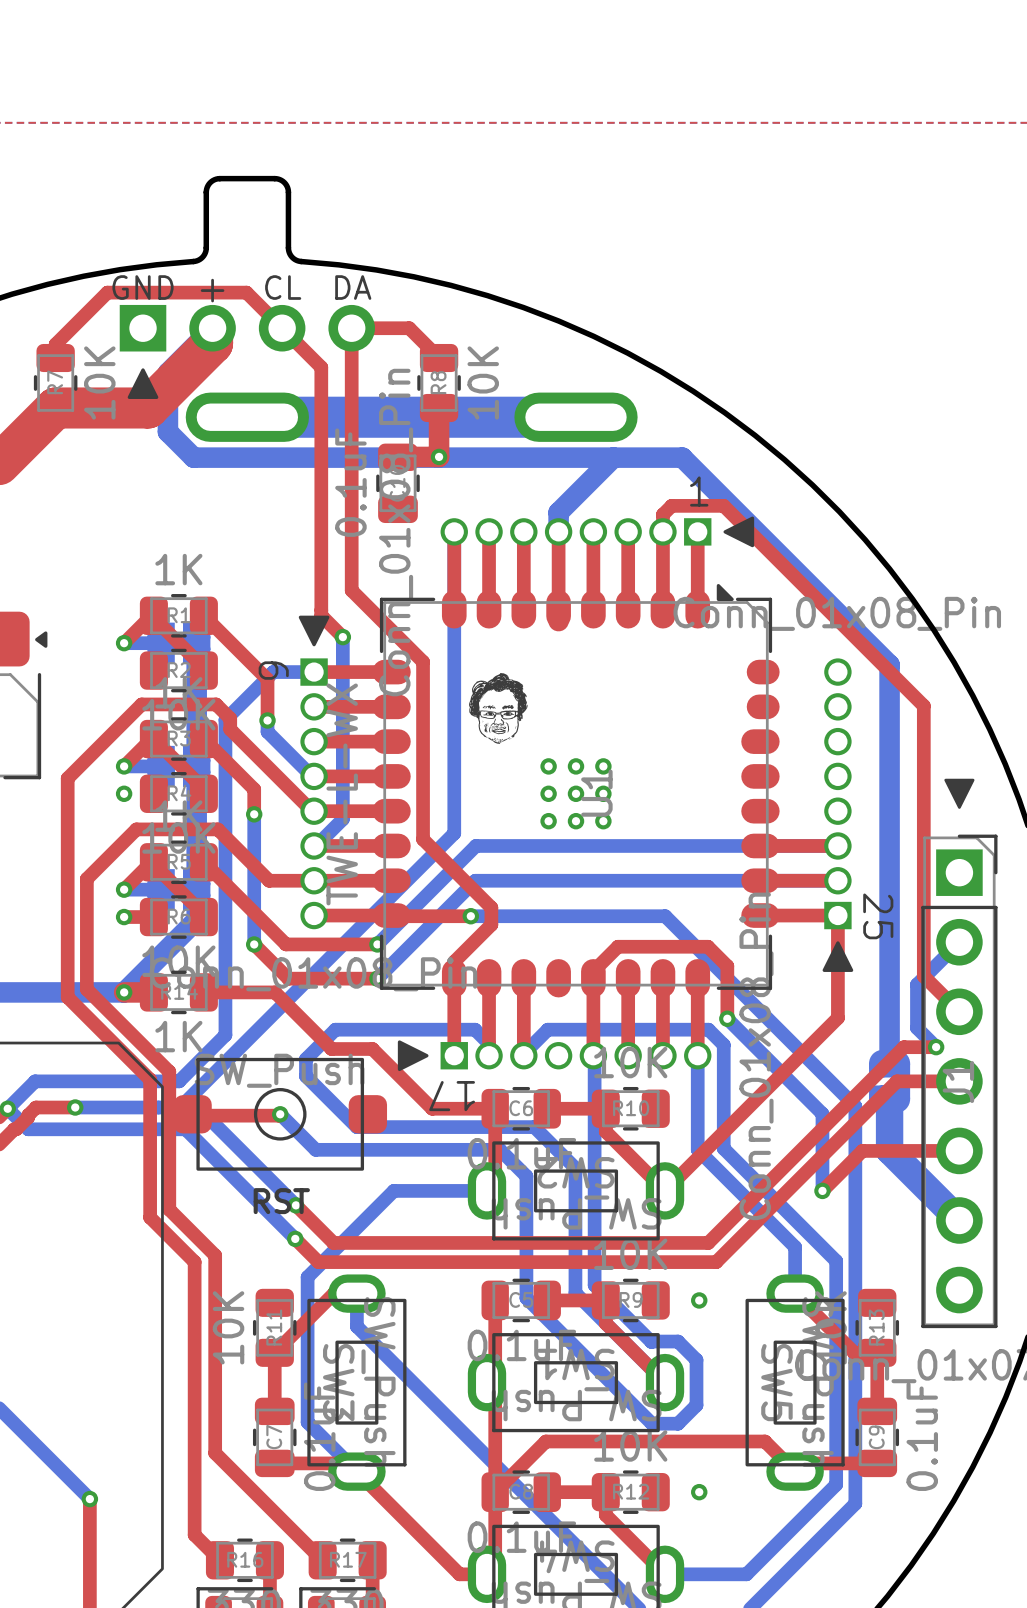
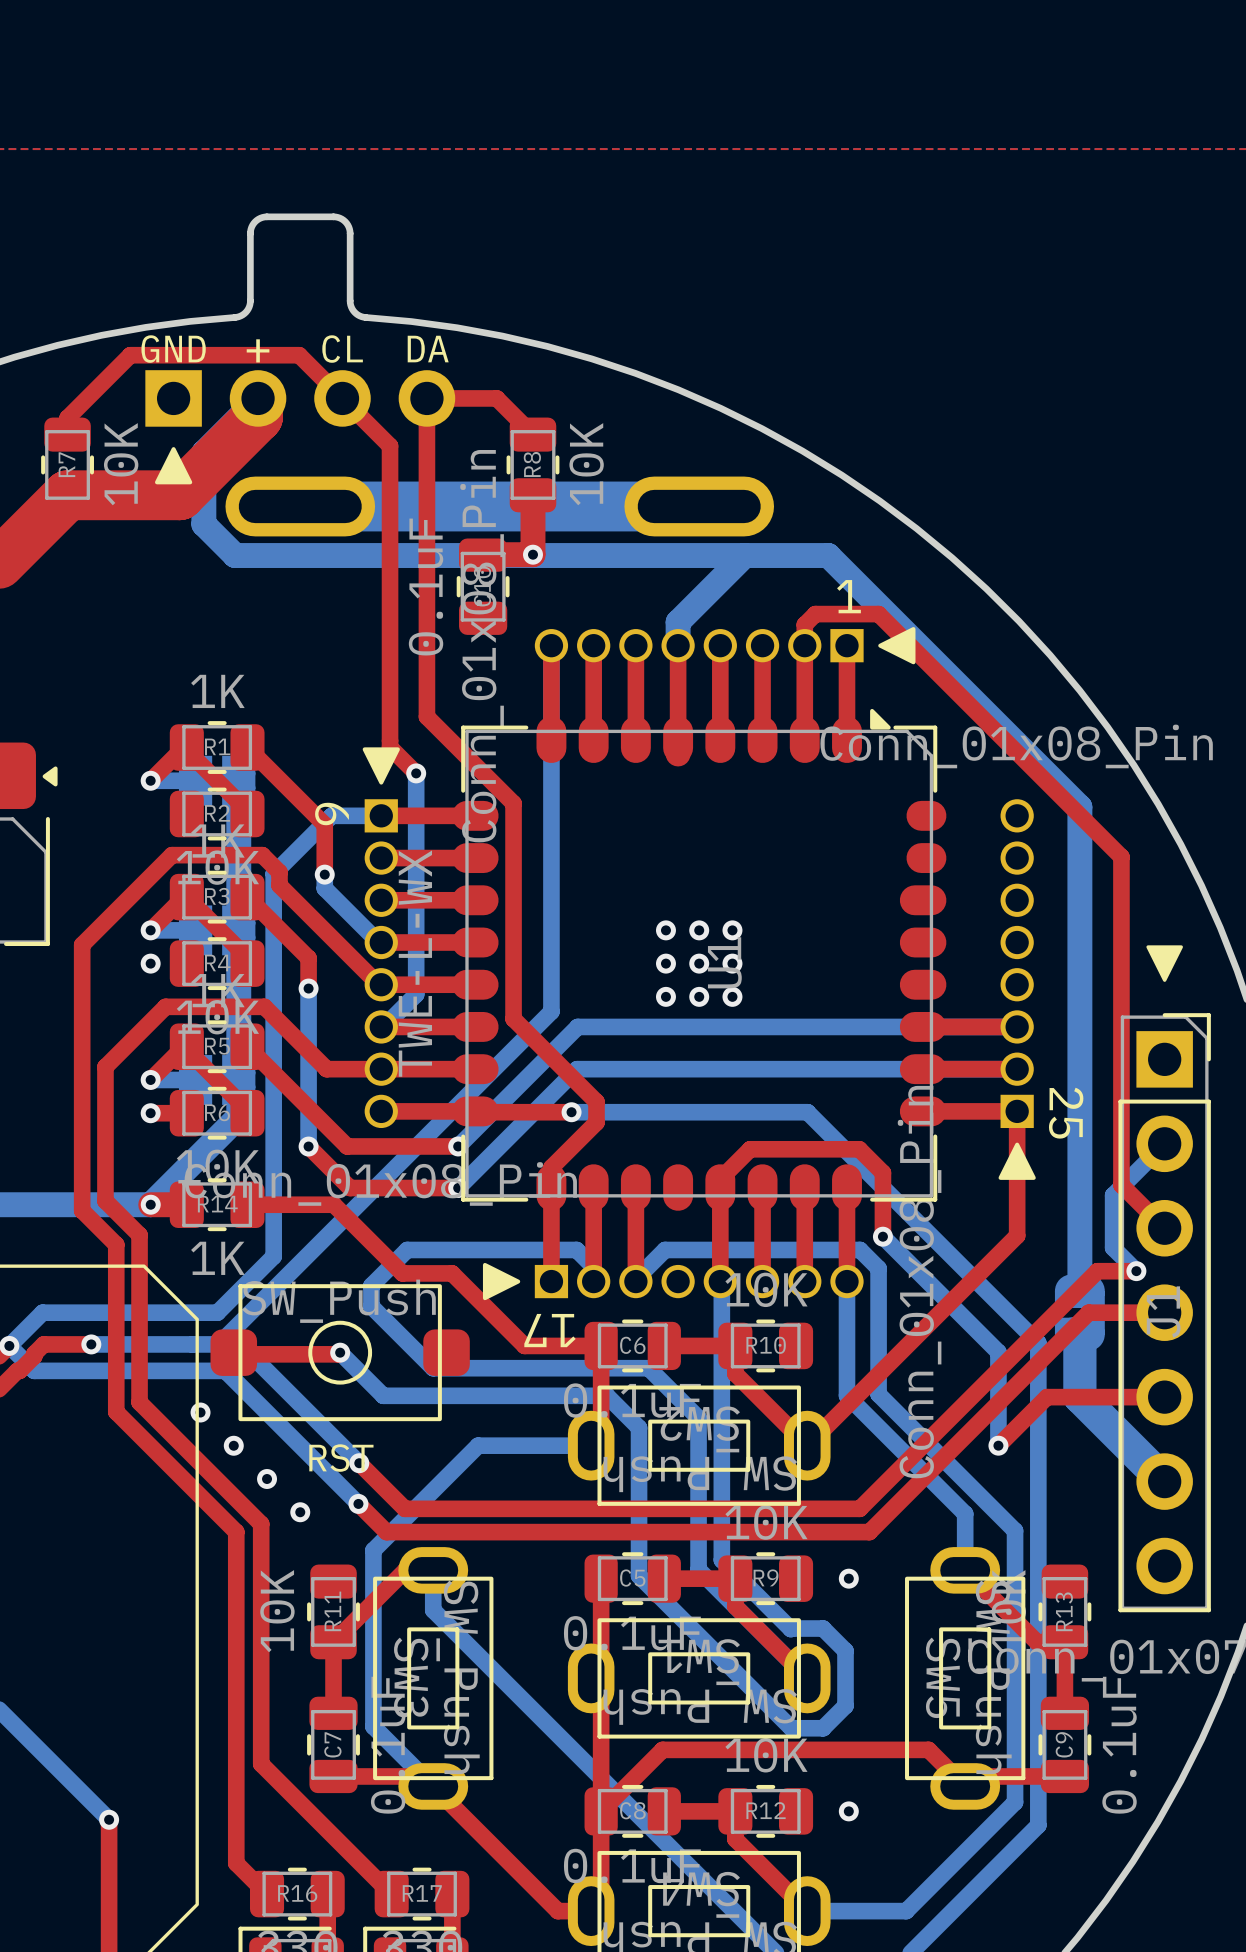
drawing: [469, 673, 528, 744] -> none
top track: (114, 1017) (169, 1071) (169, 1209) -> (139, 1235) (139, 1402) (205, 1468)
top track: (95, 1025) (150, 1079) (150, 1217) -> (116, 1244) (116, 1411) (182, 1477)
via: none -> (200, 1412)
via: none -> (233, 1445)
via: none -> (267, 1479)
via: none -> (300, 1512)

